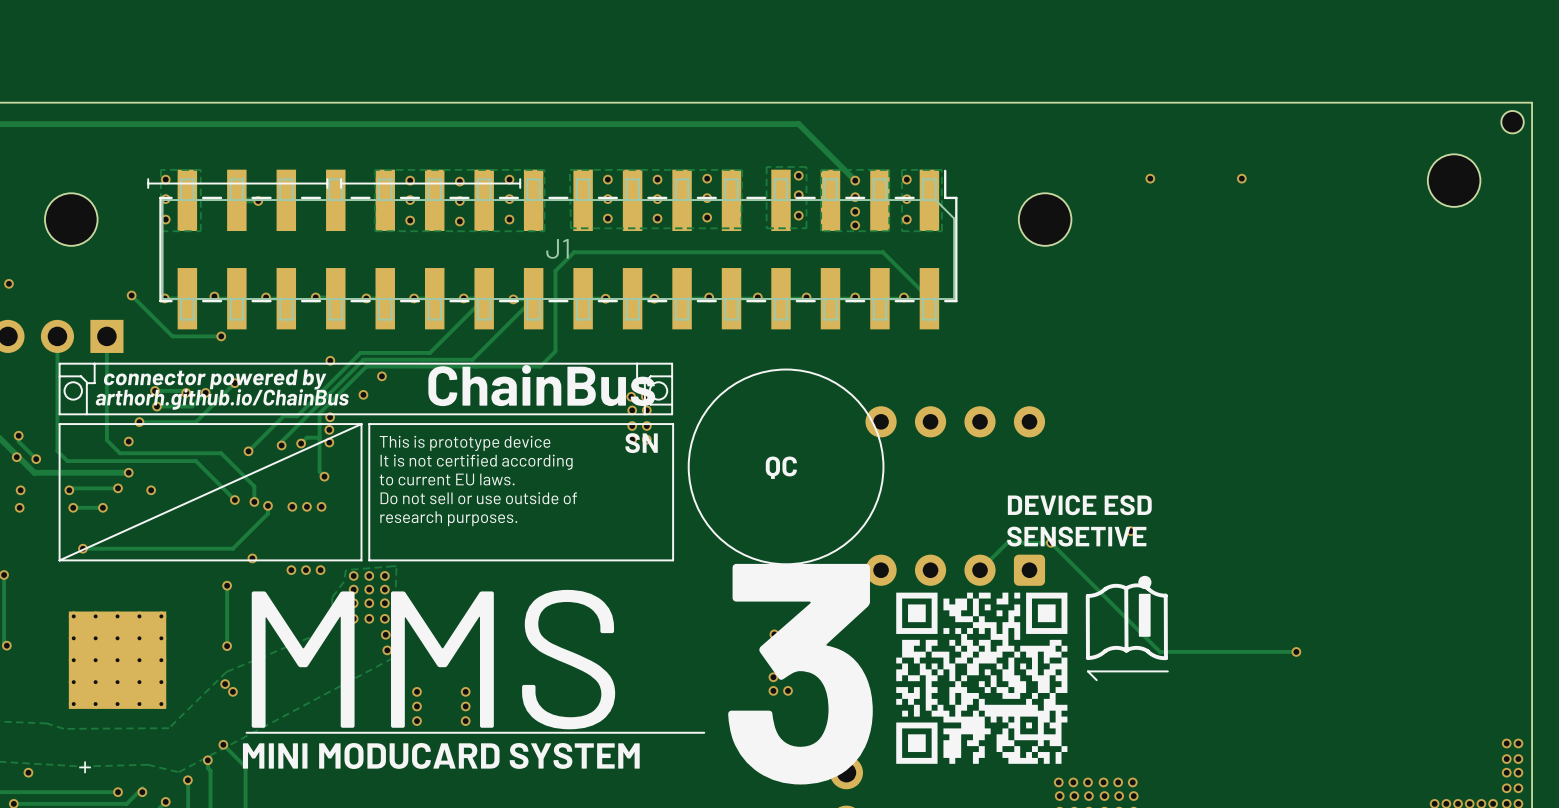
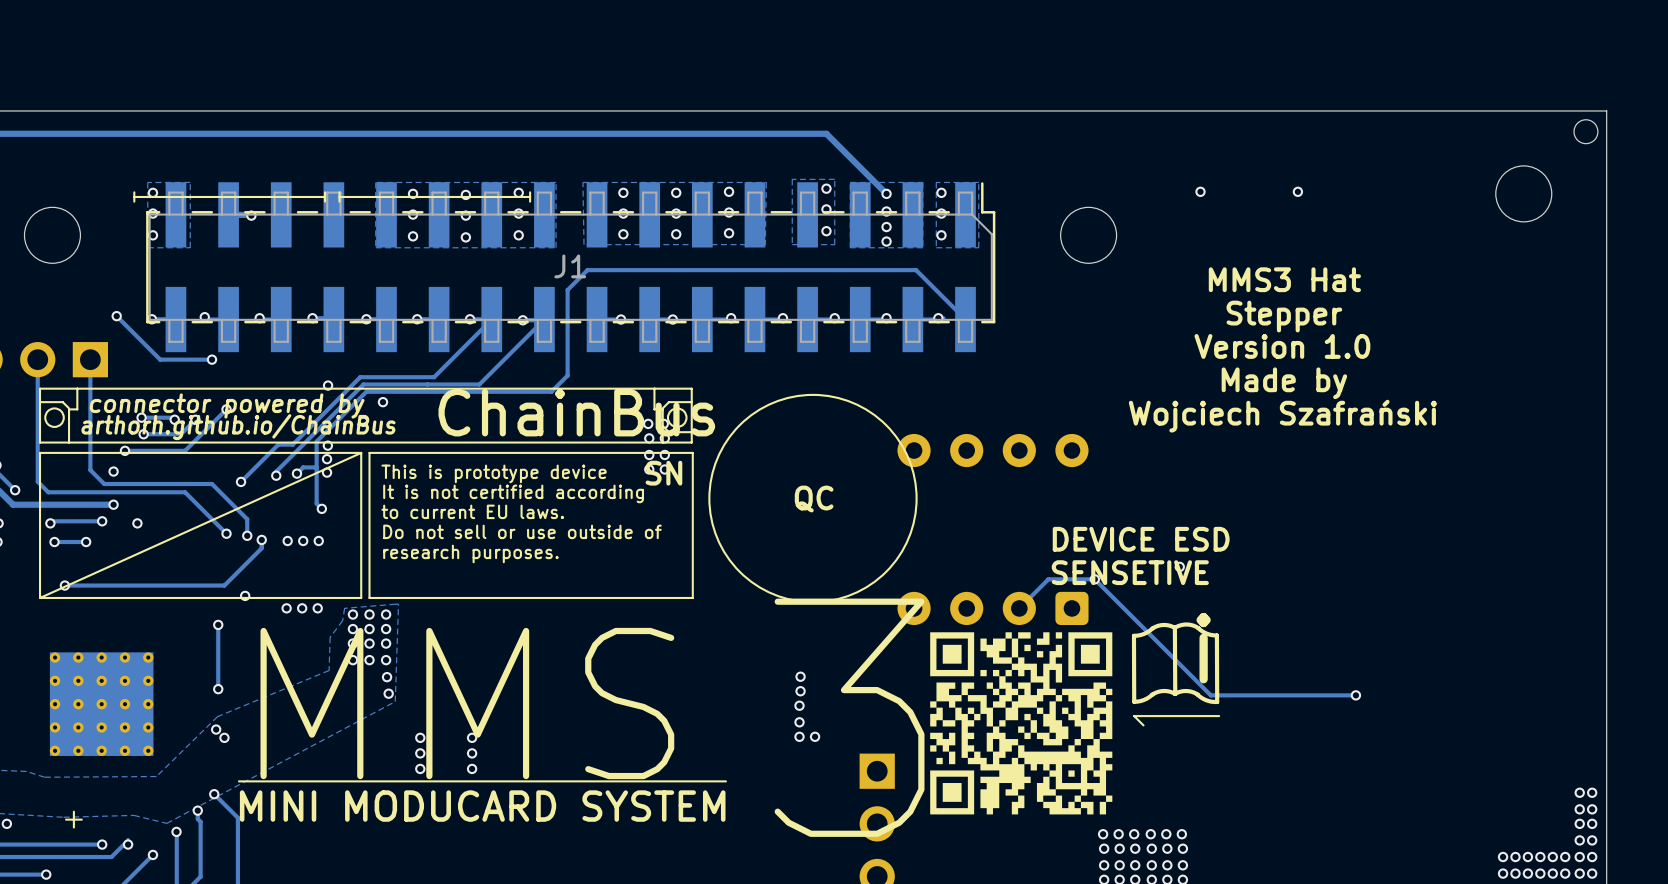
text: none -> MMS3 Hat (1284, 279)
text: none -> Stepper (1284, 316)
text: none -> Version 1.0 (1282, 346)
text: none -> Made by (1284, 383)
text: none -> Wojciech Szafrański (1282, 416)

